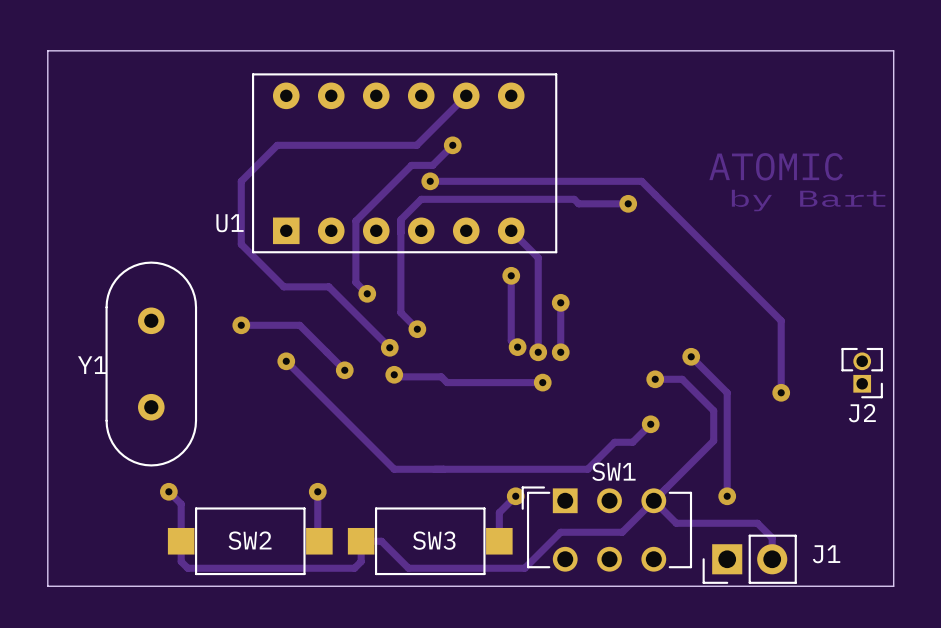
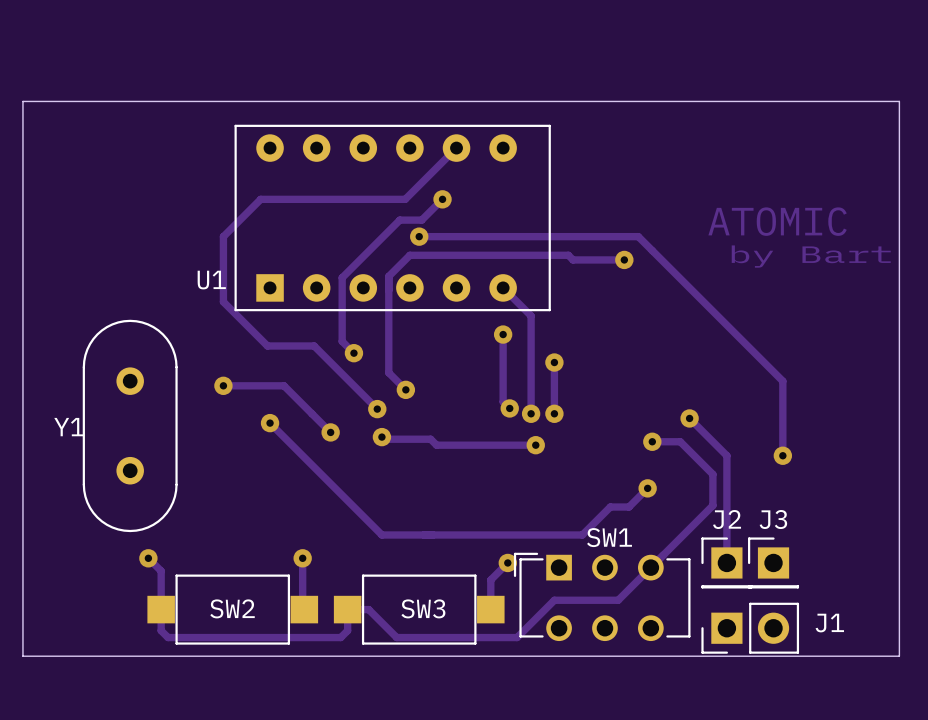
J2 footprint: [841, 347, 883, 399] -> [701, 537, 753, 589]
J2 name position: J2 (862, 413) -> J2 (727, 519)
via: (727, 496) -> none
J3: none -> (773, 562)
track: (653, 500) (676, 523) (757, 523) (772, 537) (772, 559) -> none

